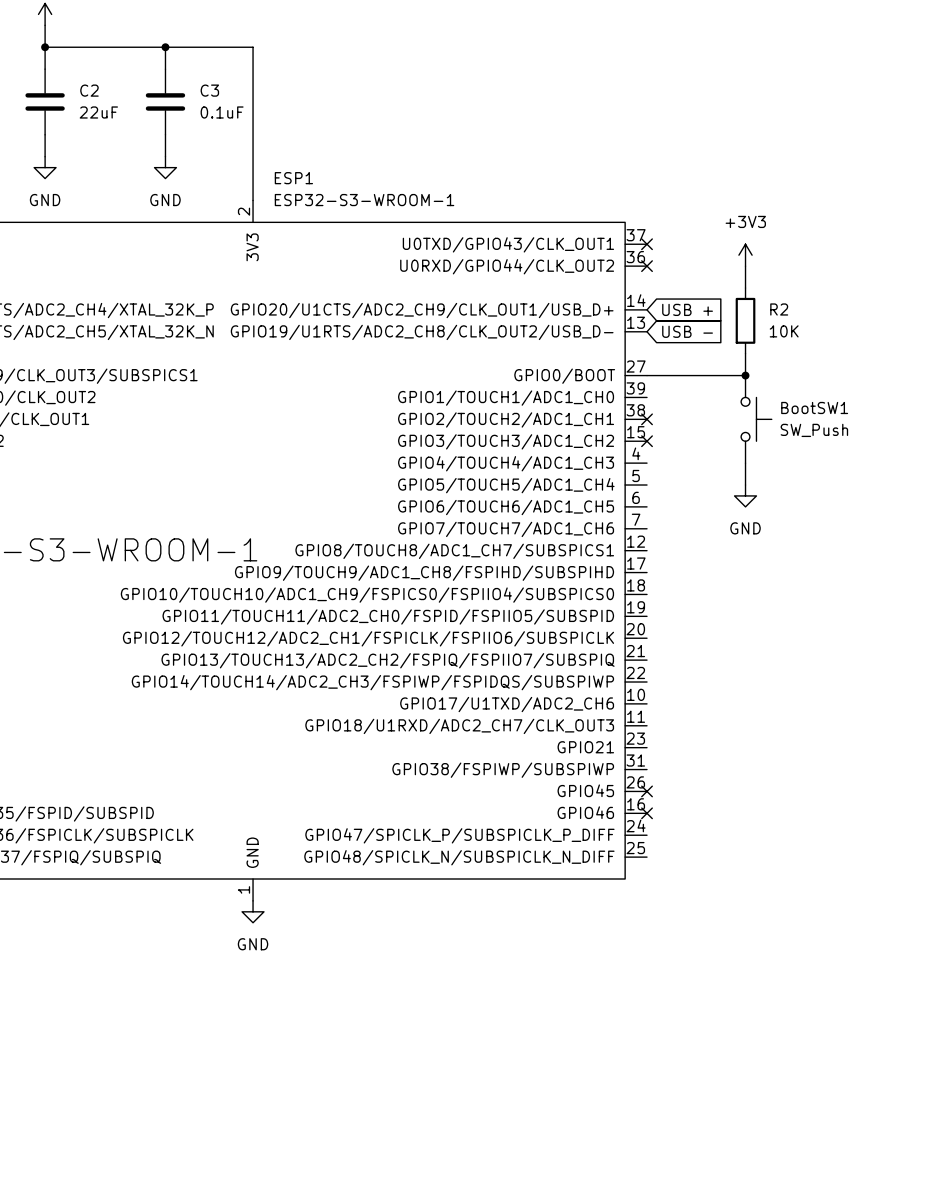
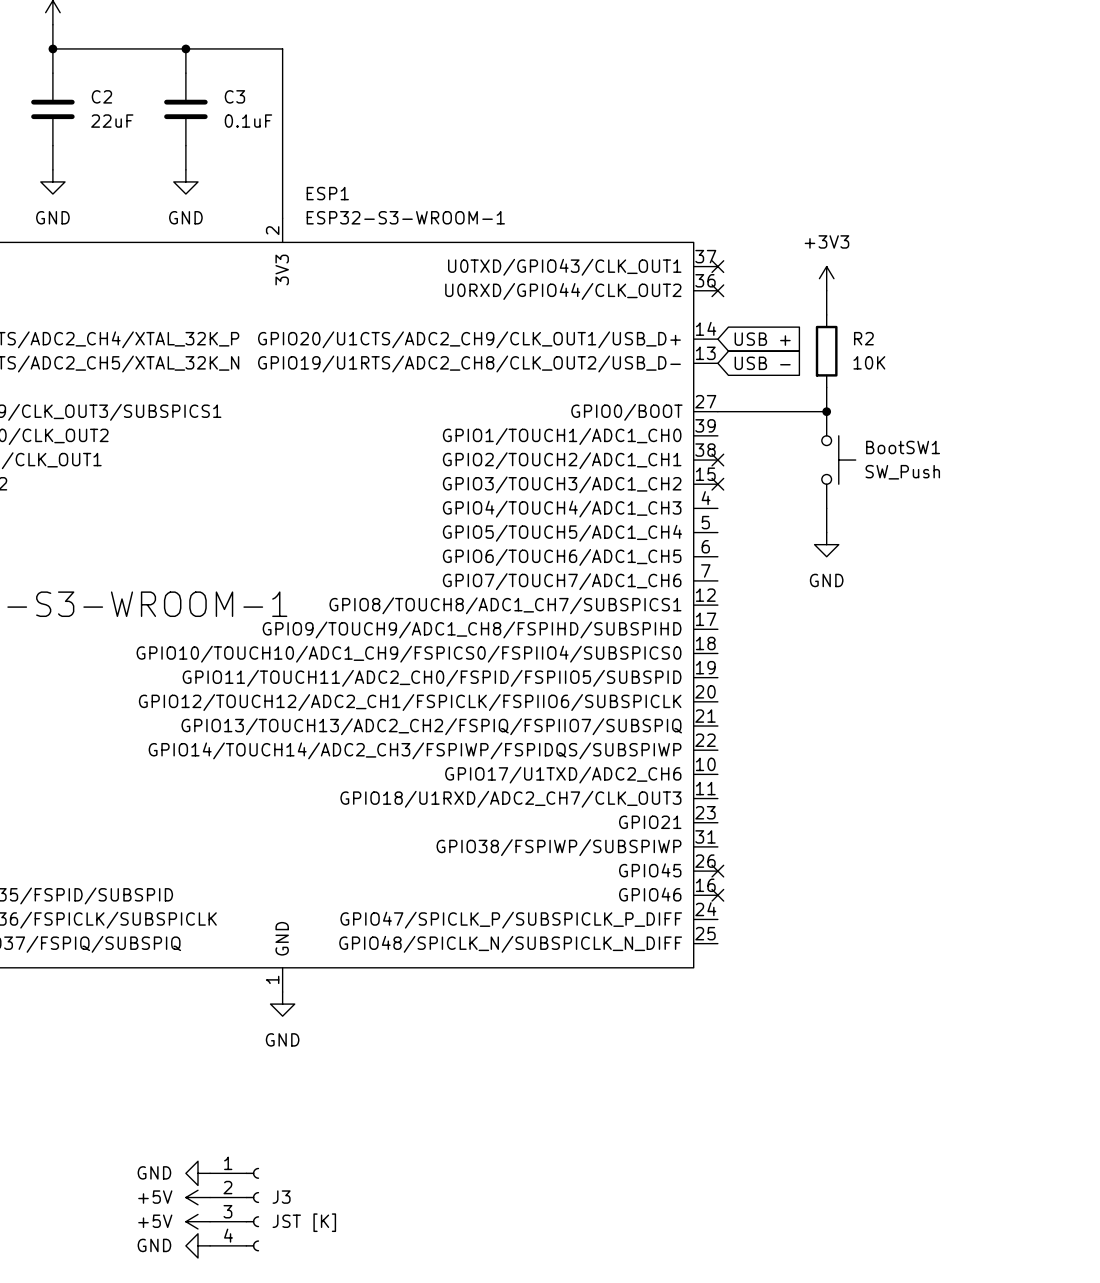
power symbol: none -> GND (197, 1173)
power symbol: none -> +5V (197, 1197)
J3: none -> JST [K] (234, 1209)
power symbol: none -> +5V (197, 1221)
power symbol: none -> GND (197, 1245)

